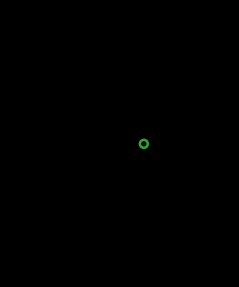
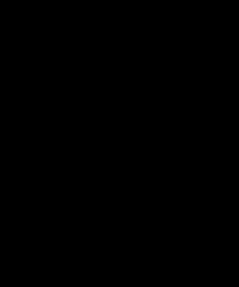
via: (143, 143) -> none

